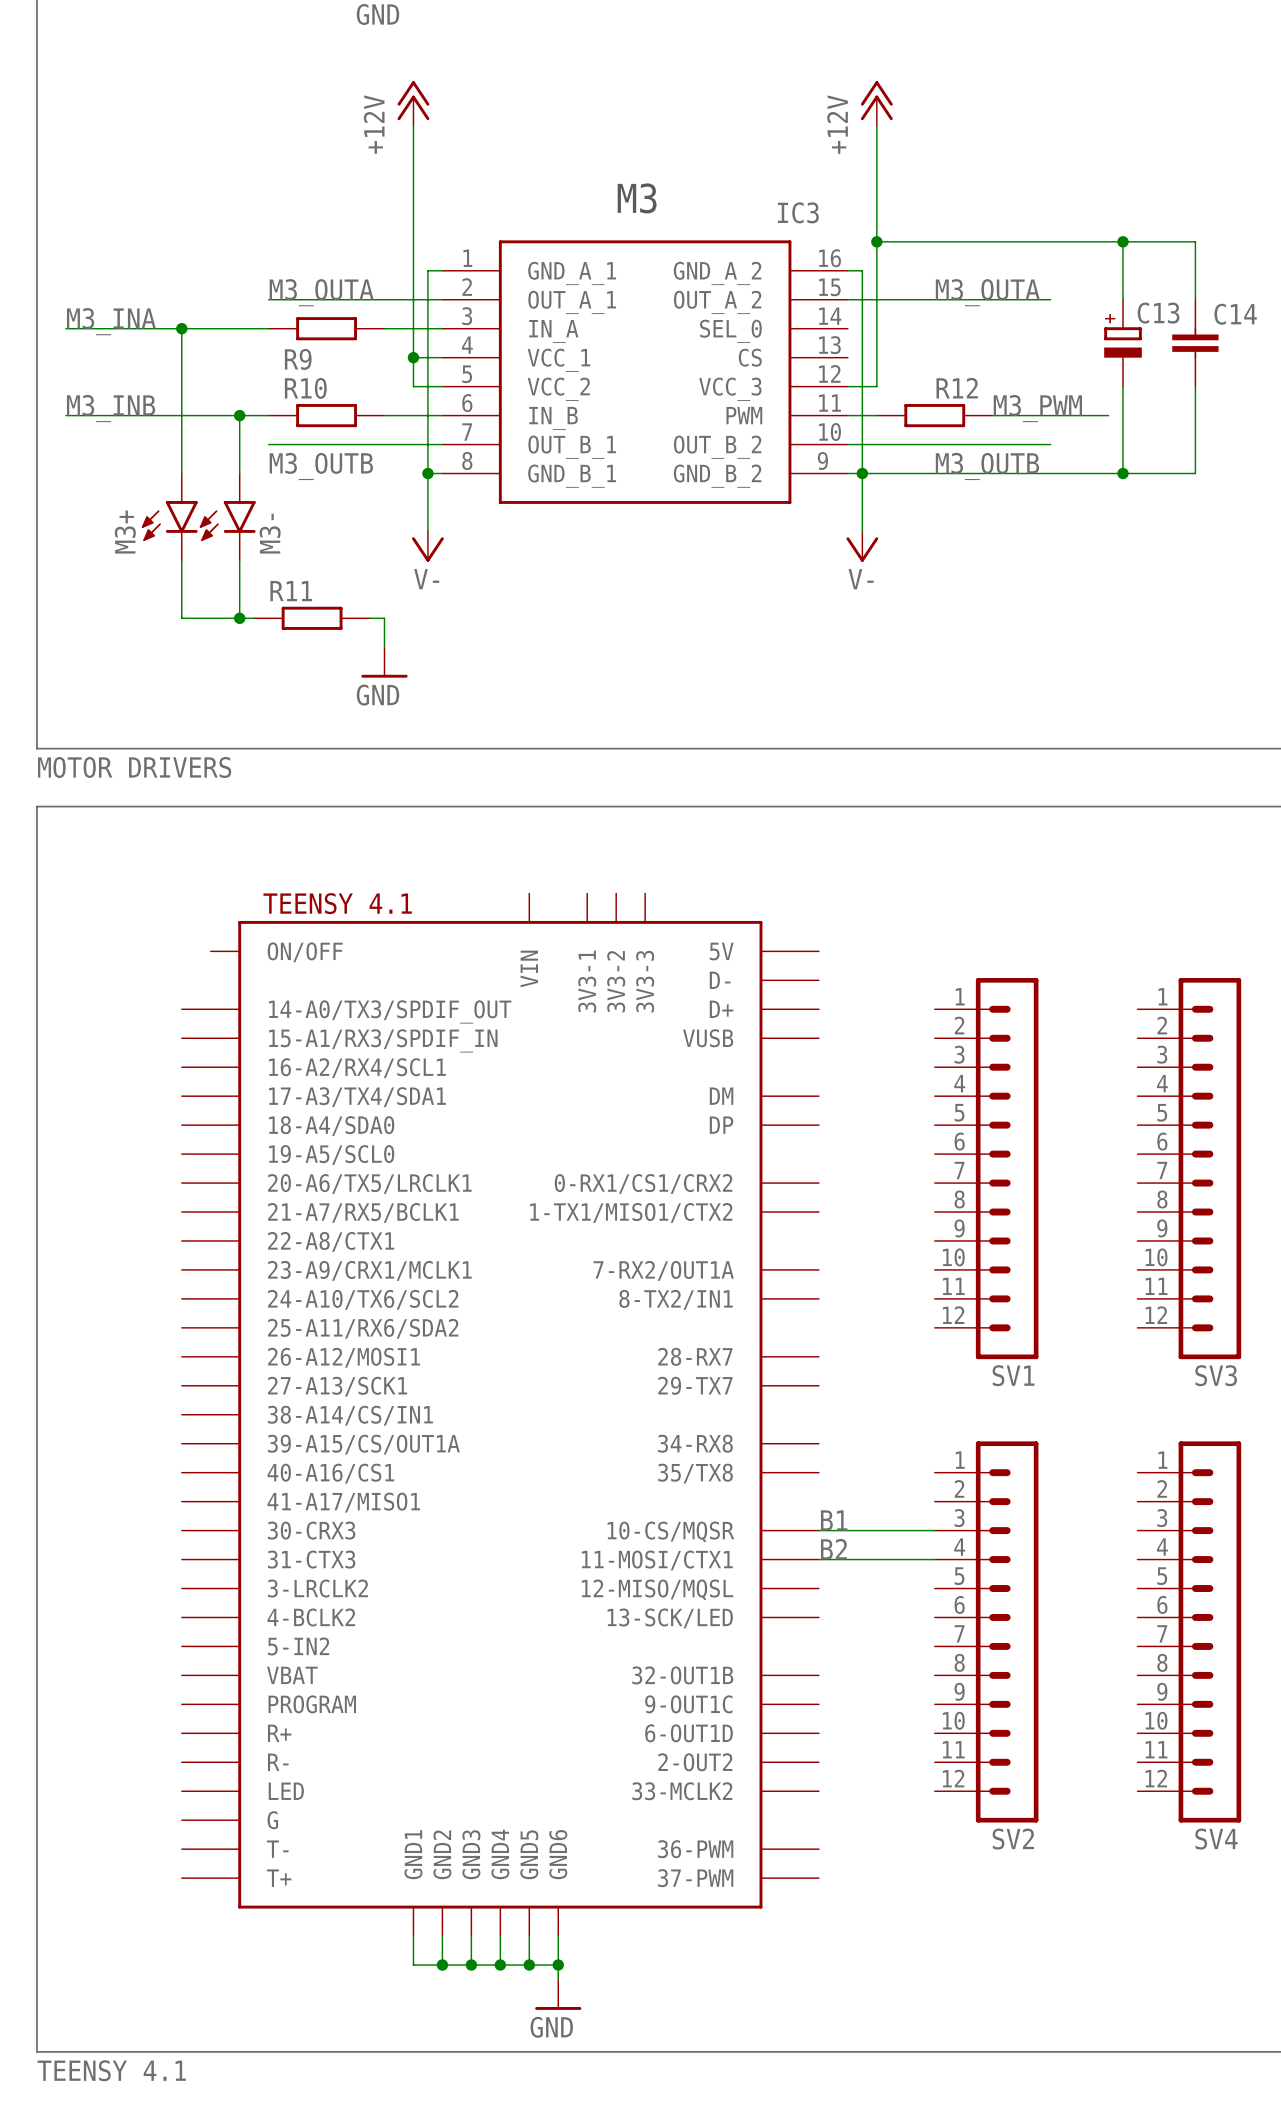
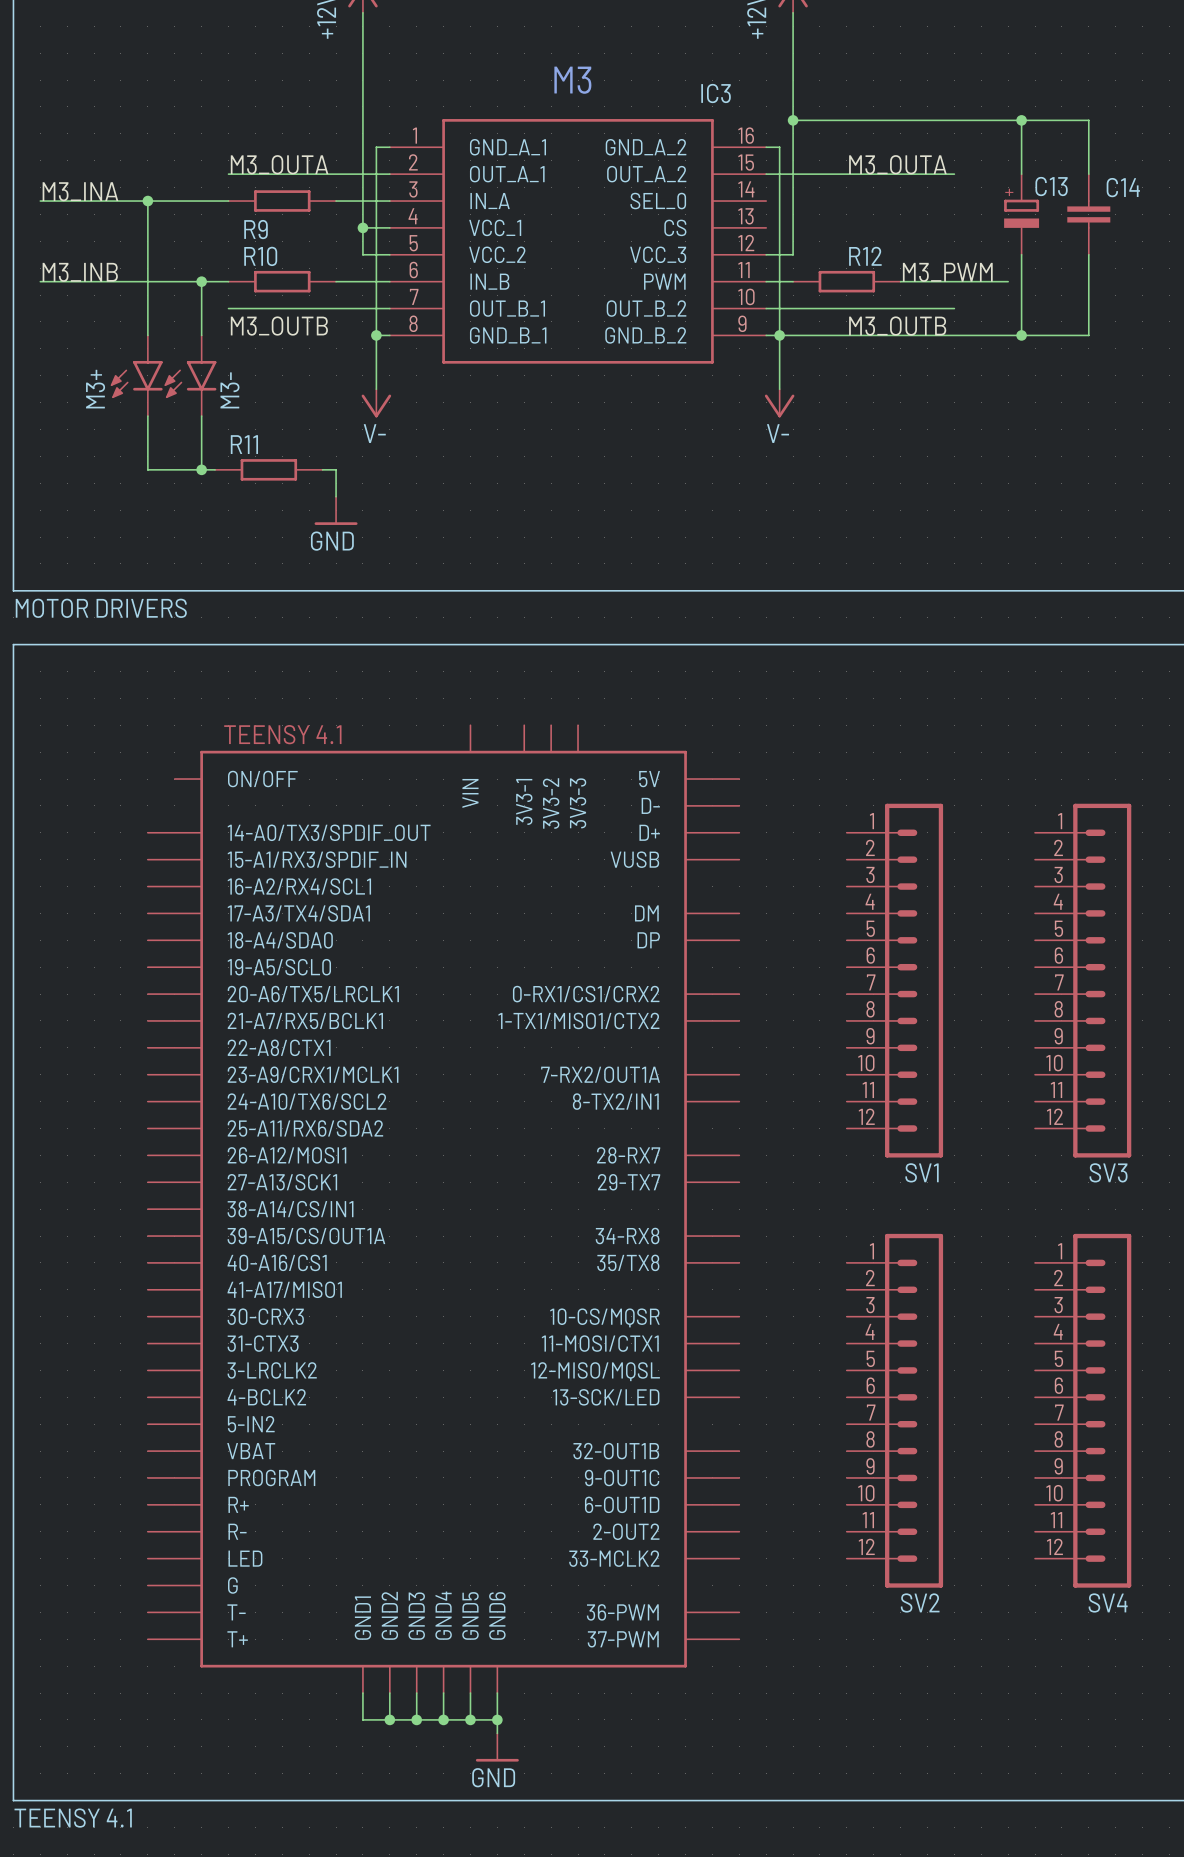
label: B1 (834, 1520) -> none
wire: (818, 1530) (934, 1530) -> none
label: B2 (833, 1549) -> none
wire: (818, 1559) (934, 1559) -> none

